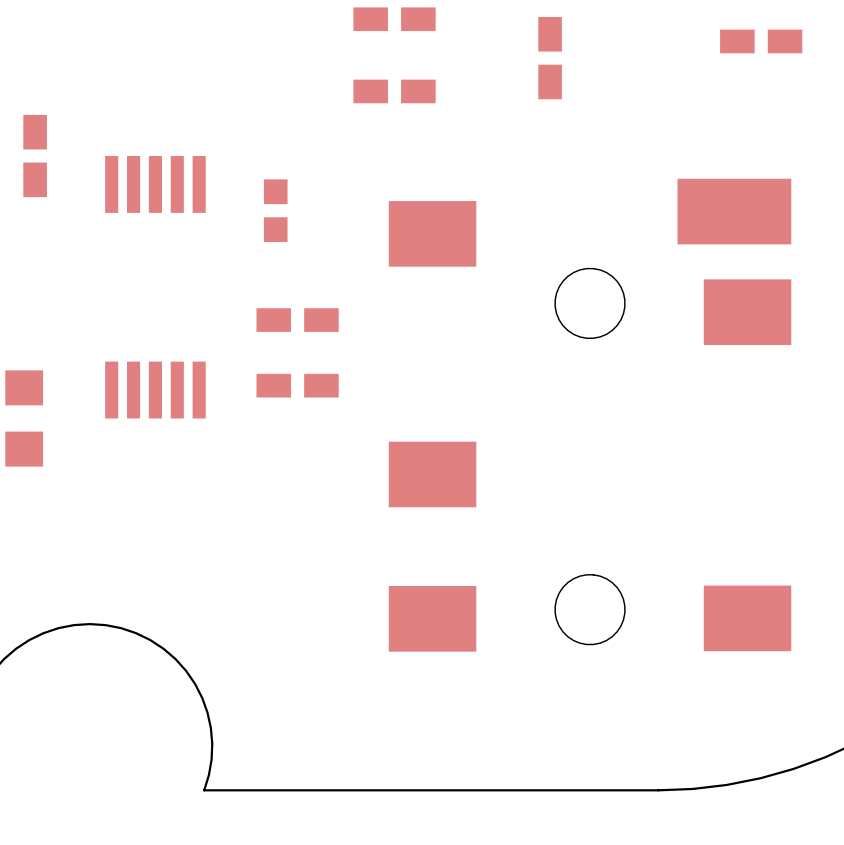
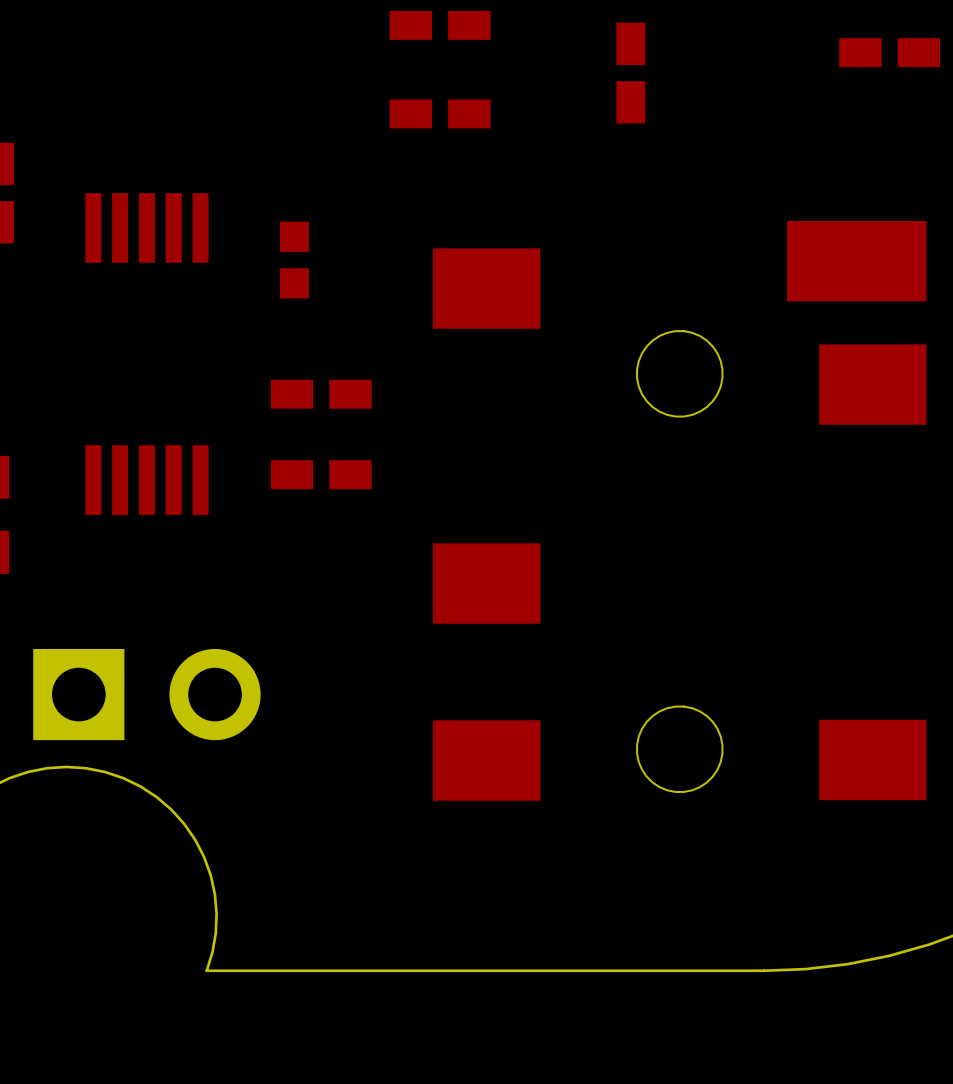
part: none -> (146, 694)

